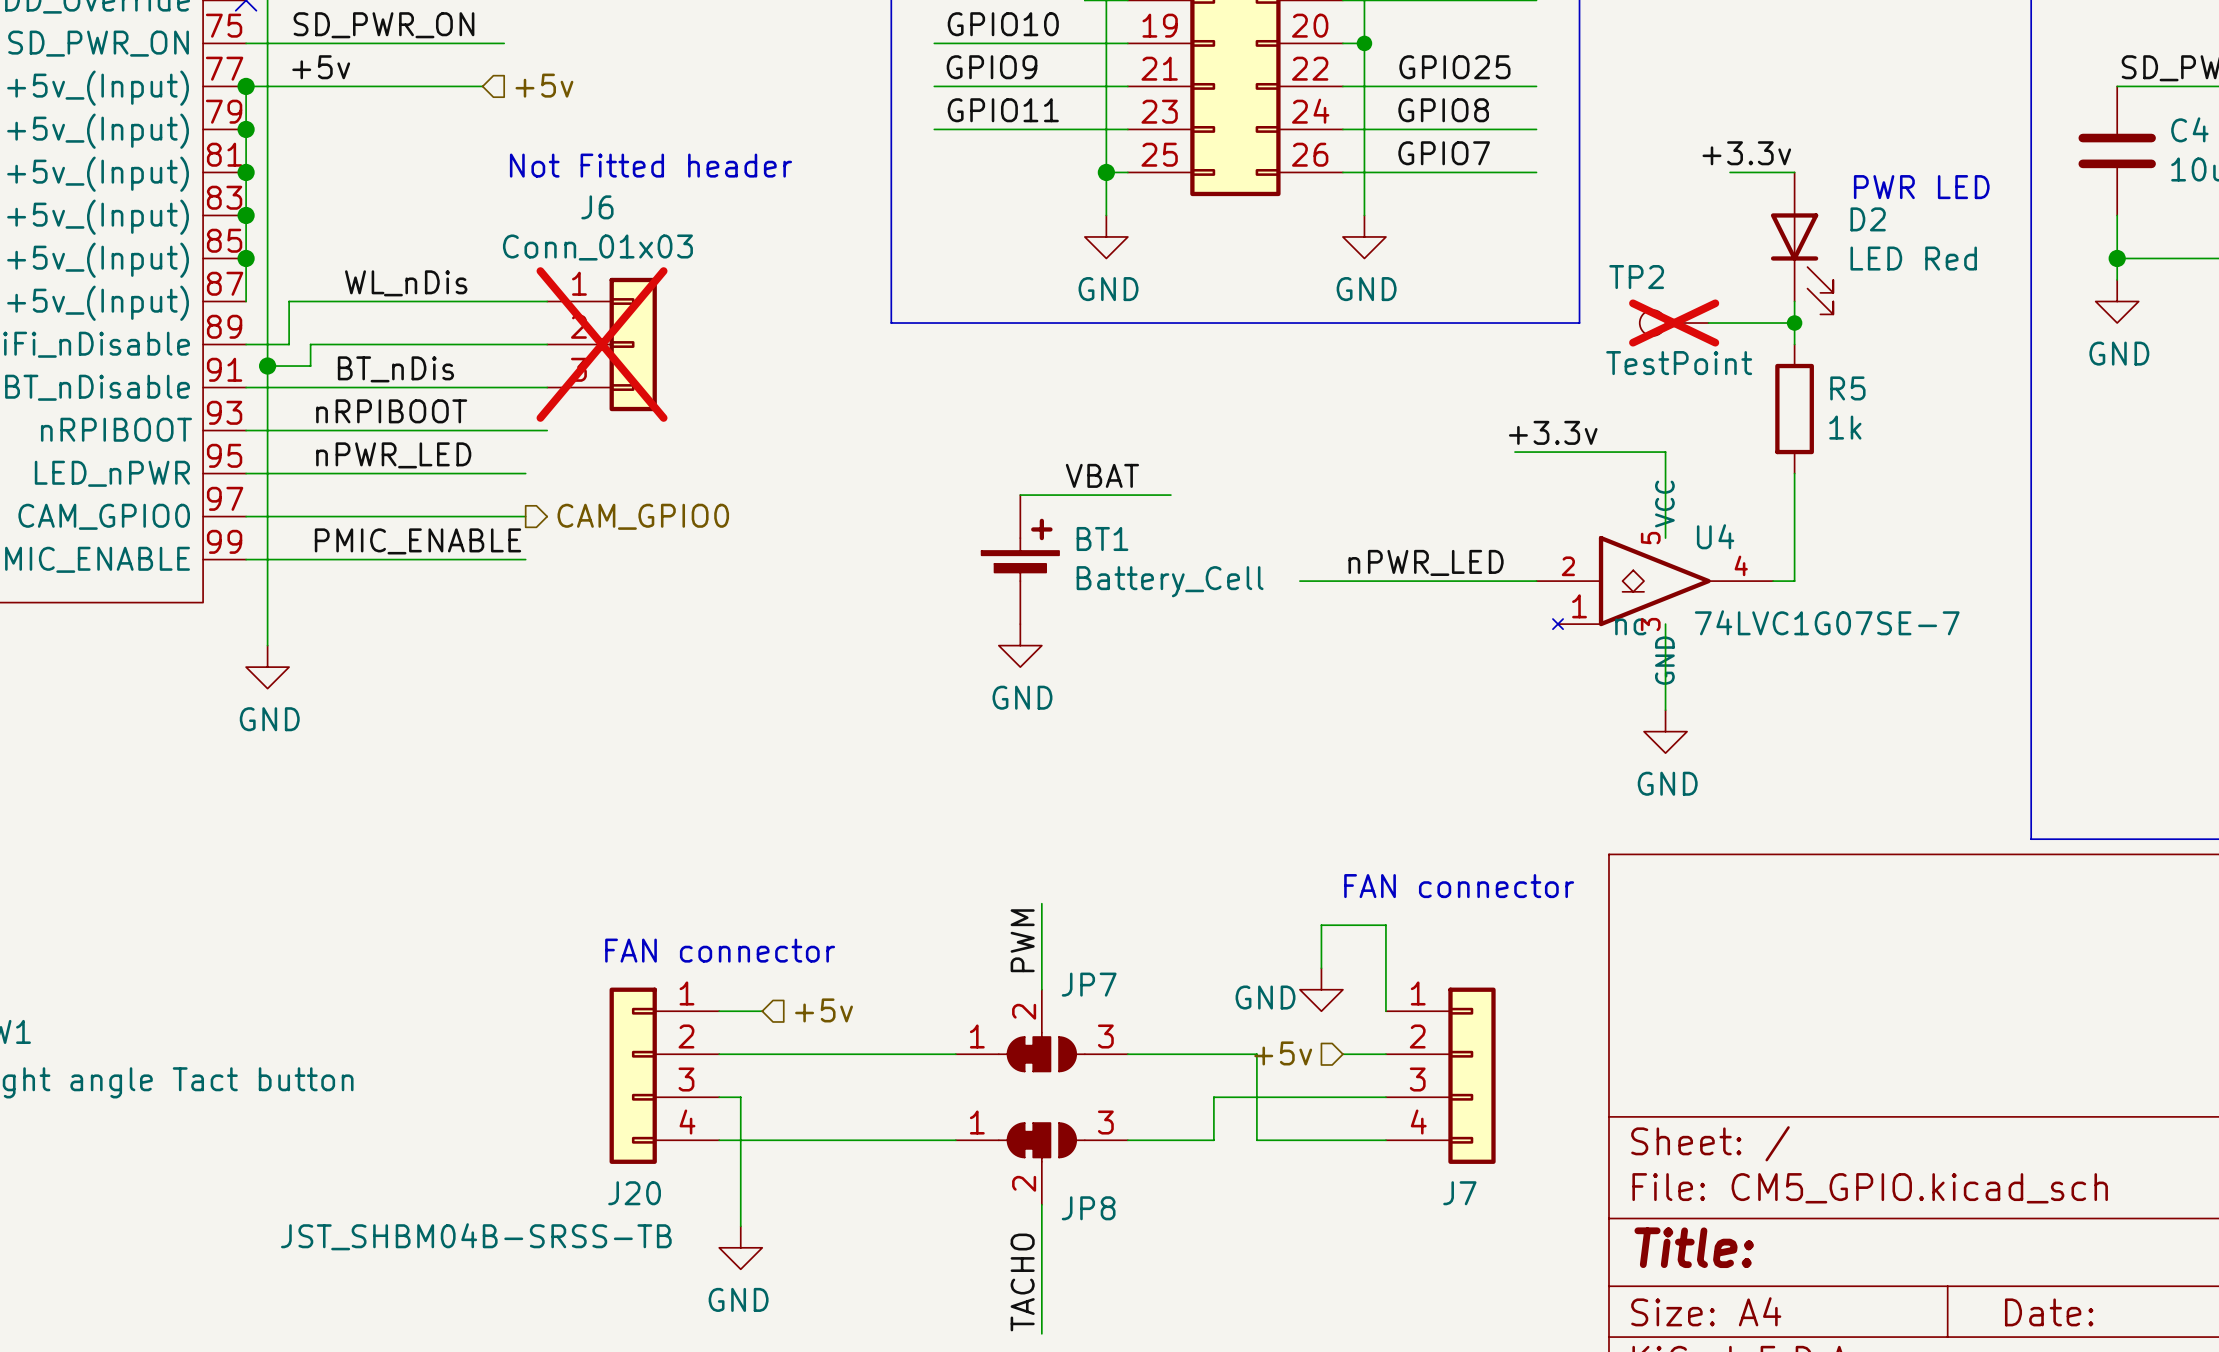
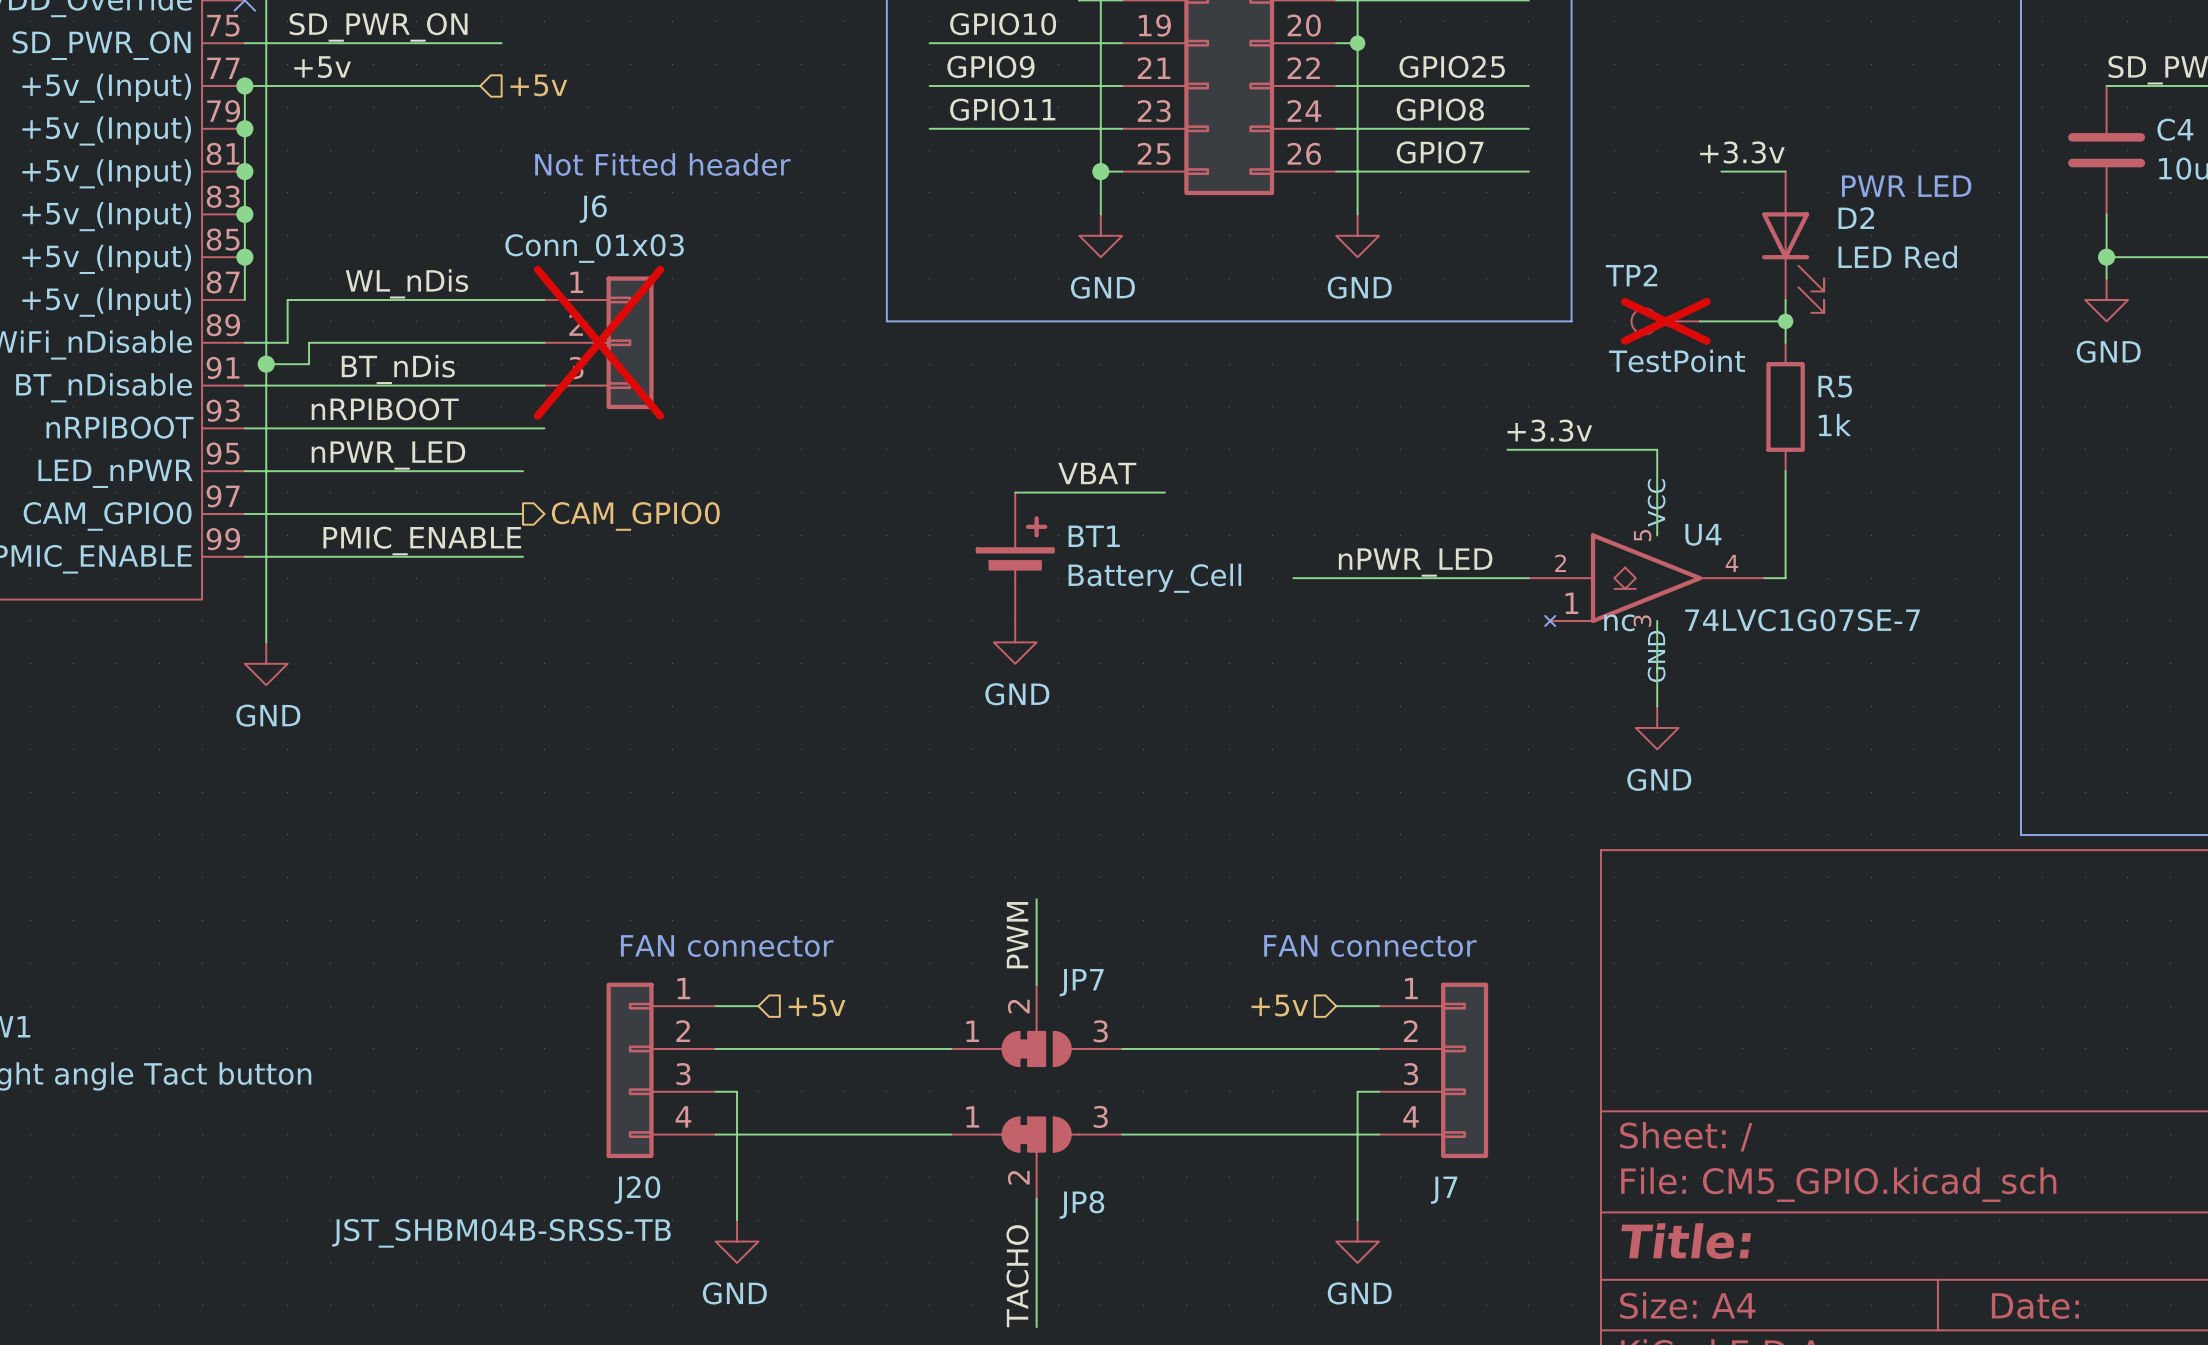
text position: FAN connector (1459, 886) -> FAN connector (1370, 946)
wire: (1321, 968) (1321, 925) (1385, 925) (1385, 1011) -> (1336, 1006) (1379, 1006)
power symbol position: GND (1321, 989) -> GND (1357, 1241)
power symbol text position: GND (1265, 997) -> GND (1359, 1293)
hierarchical label position: +5v (1283, 1053) -> +5v (1279, 1005)
wire: (1256, 1054) (1256, 1140) -> (1207, 1134) (1250, 1134)
wire: none -> (1250, 1048) (1336, 1048)
wire: (1364, 1097) (1213, 1097) (1213, 1140) -> (1357, 1091) (1357, 1220)

